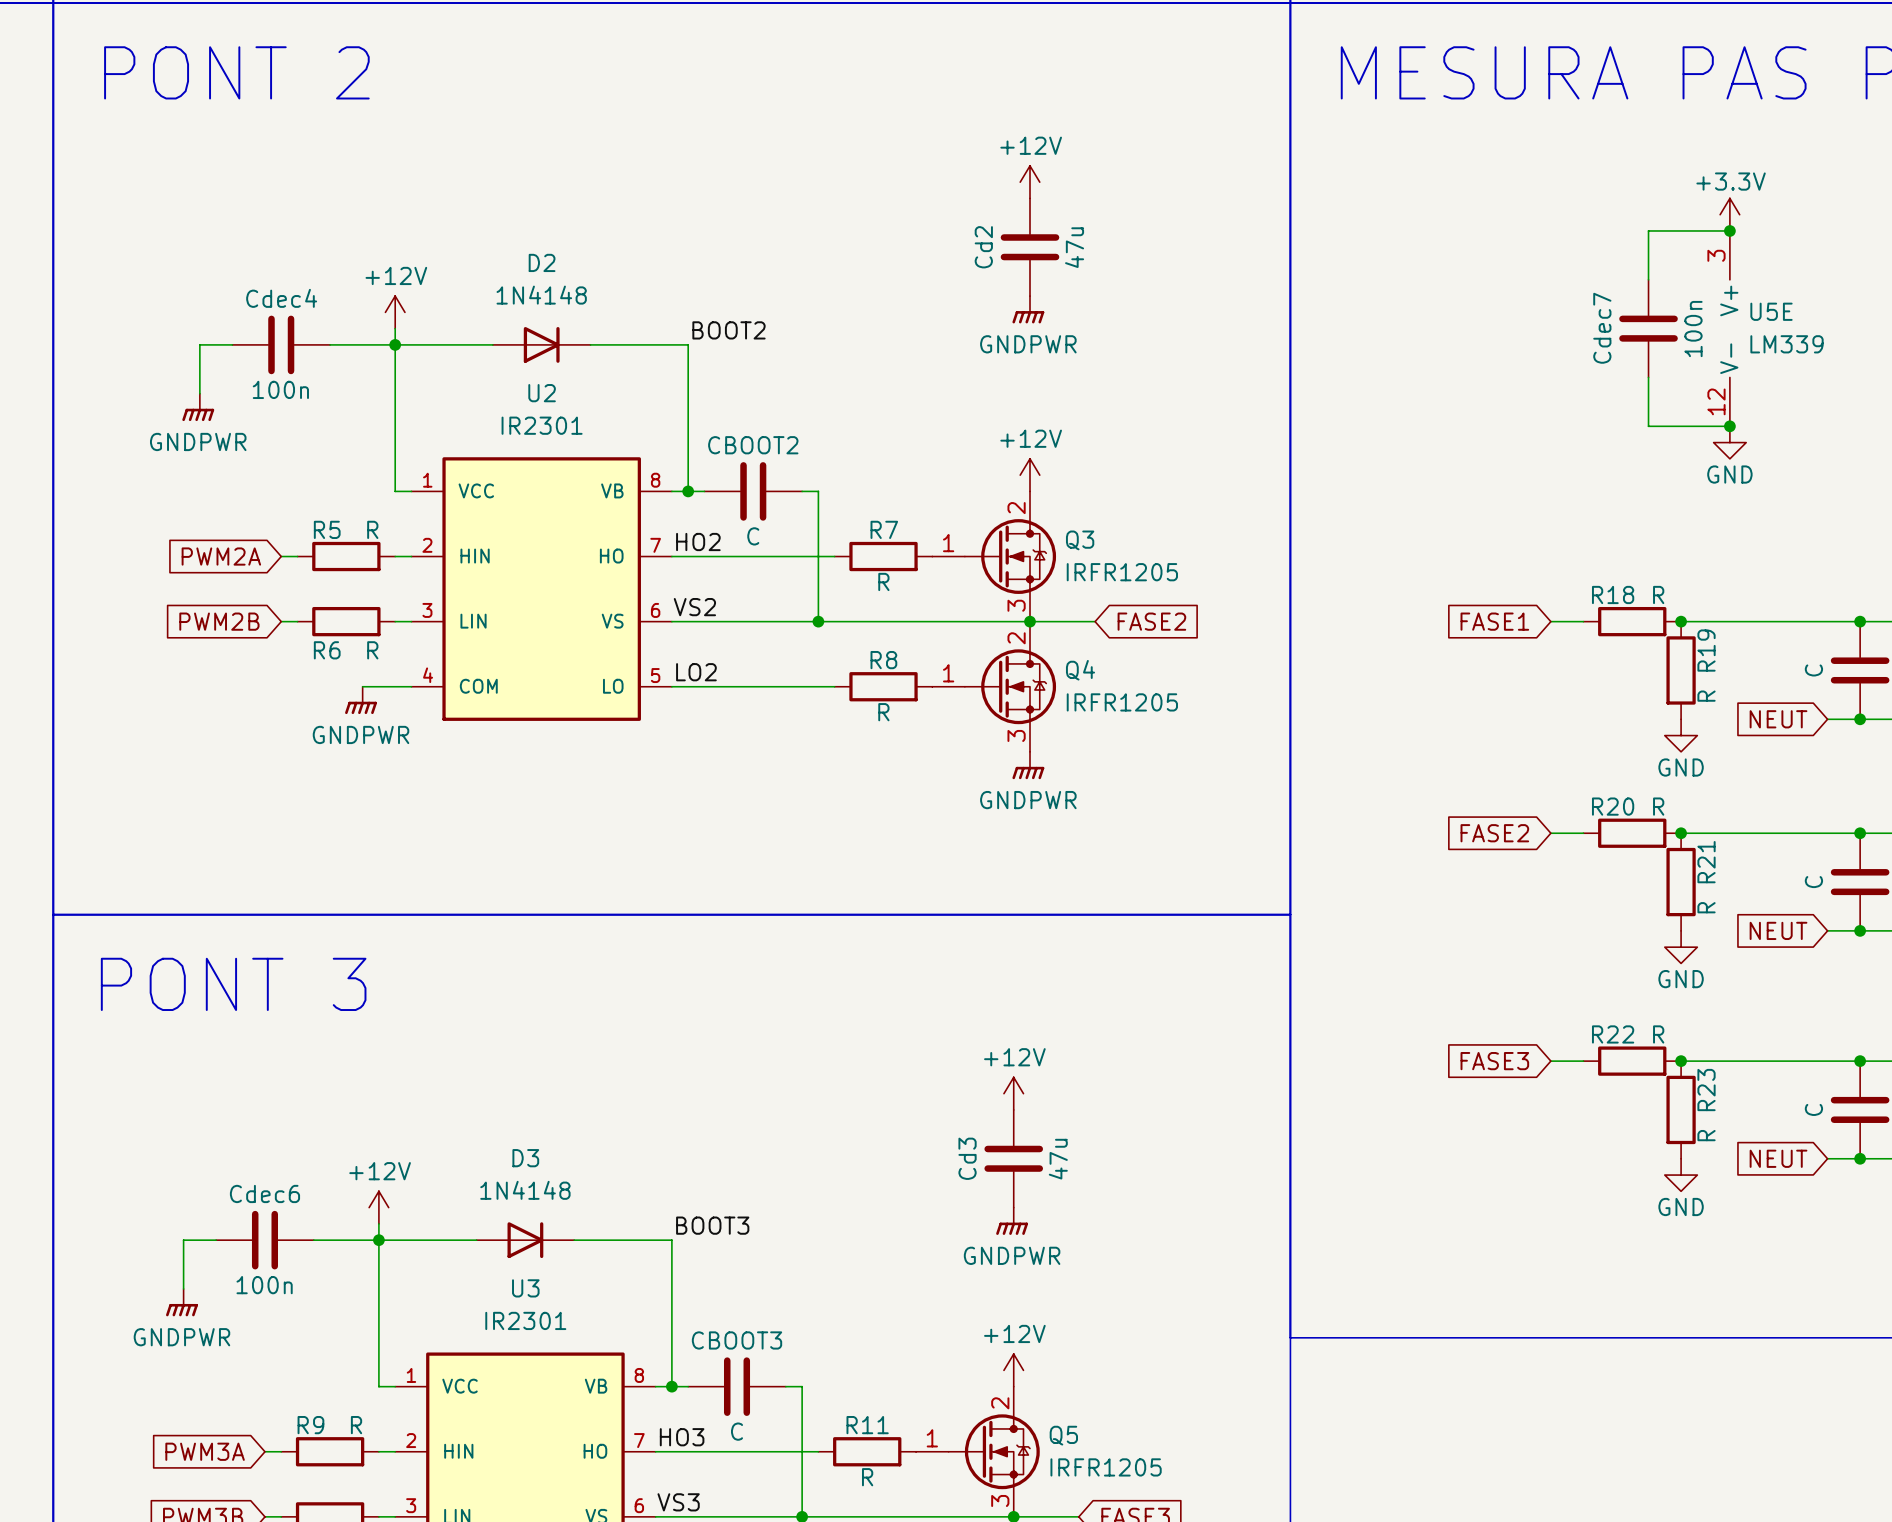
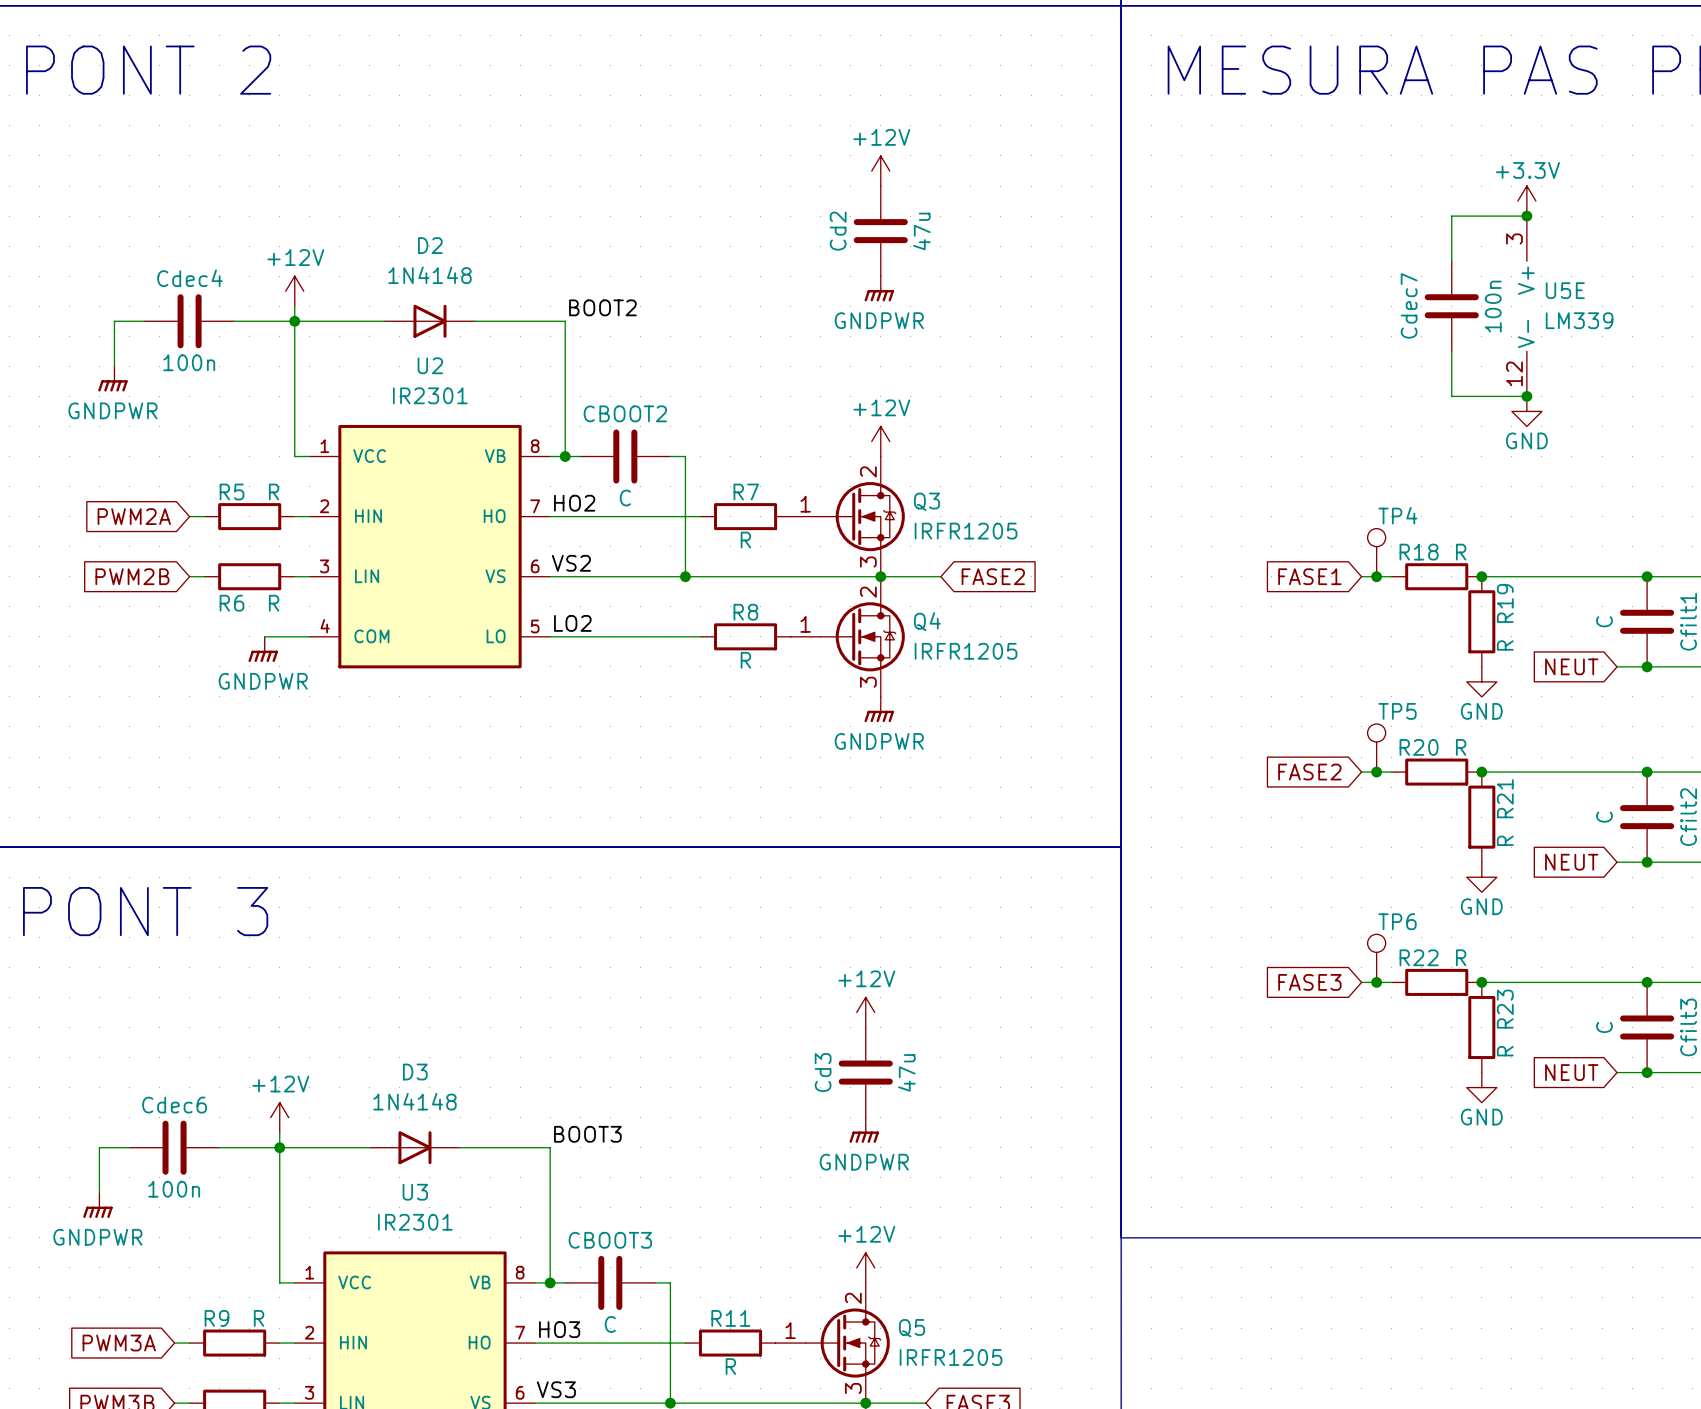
TP4: none -> (1376, 552)
junction: none -> (1376, 576)
TP5: none -> (1376, 748)
junction: none -> (1376, 772)
TP6: none -> (1376, 958)
junction: none -> (1376, 982)

